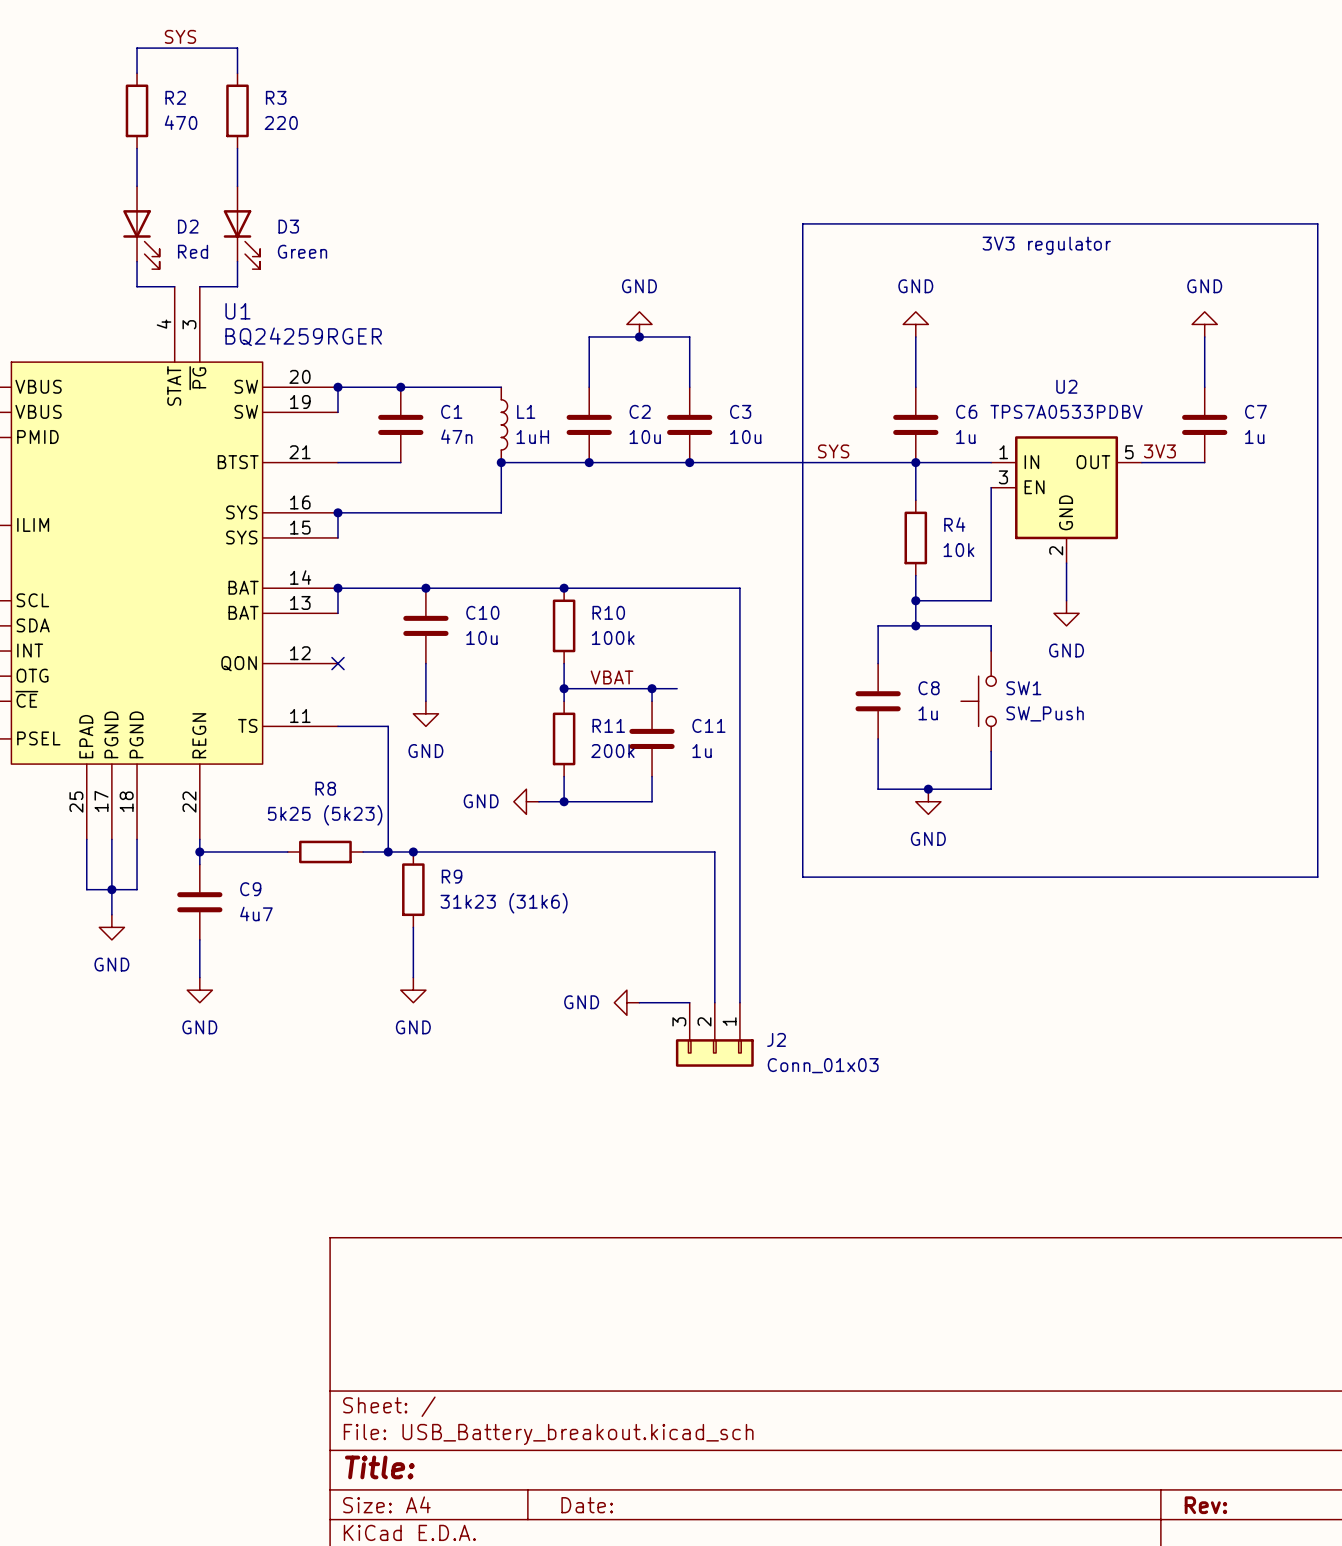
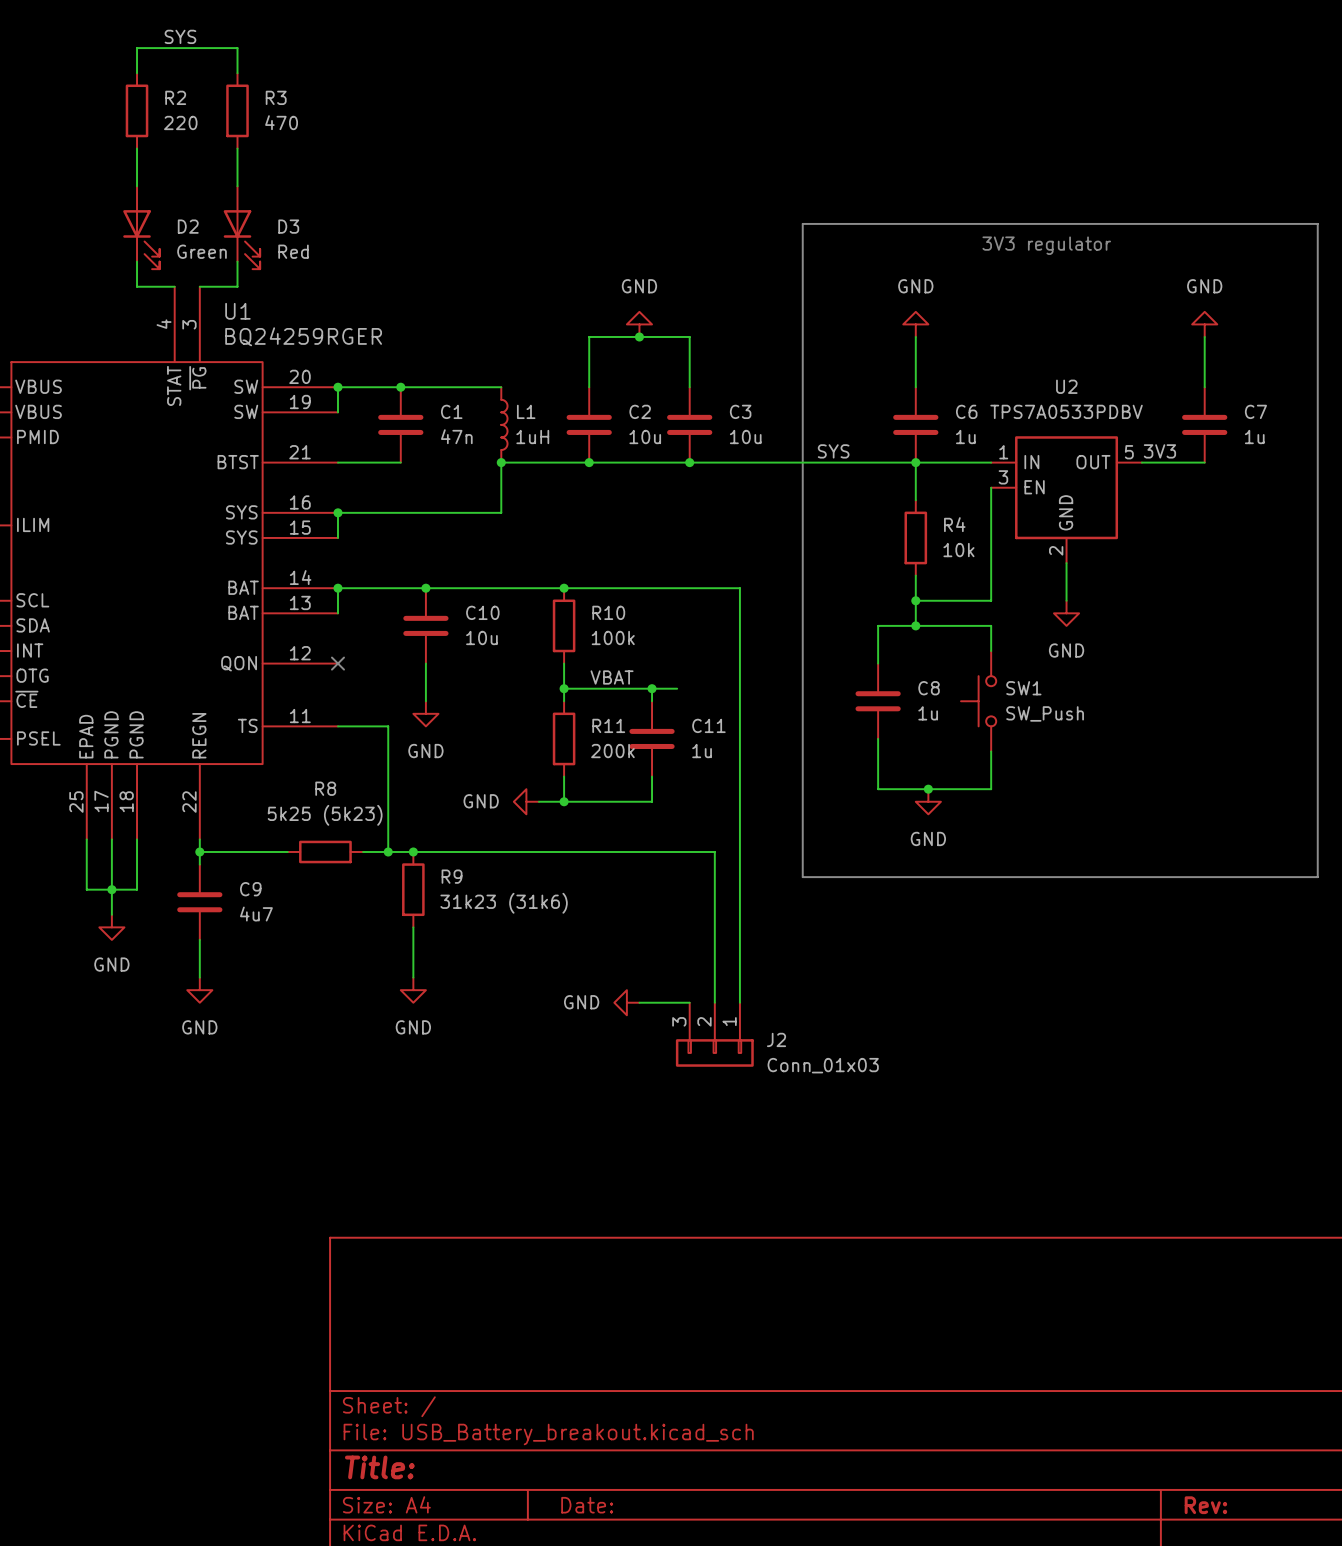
R2 value: 470 (181, 122) -> 220 (180, 122)
R3 value: 220 (281, 122) -> 470 (281, 122)
D2 value: Red (193, 251) -> Green (202, 251)
D3 value: Green (302, 251) -> Red (293, 251)

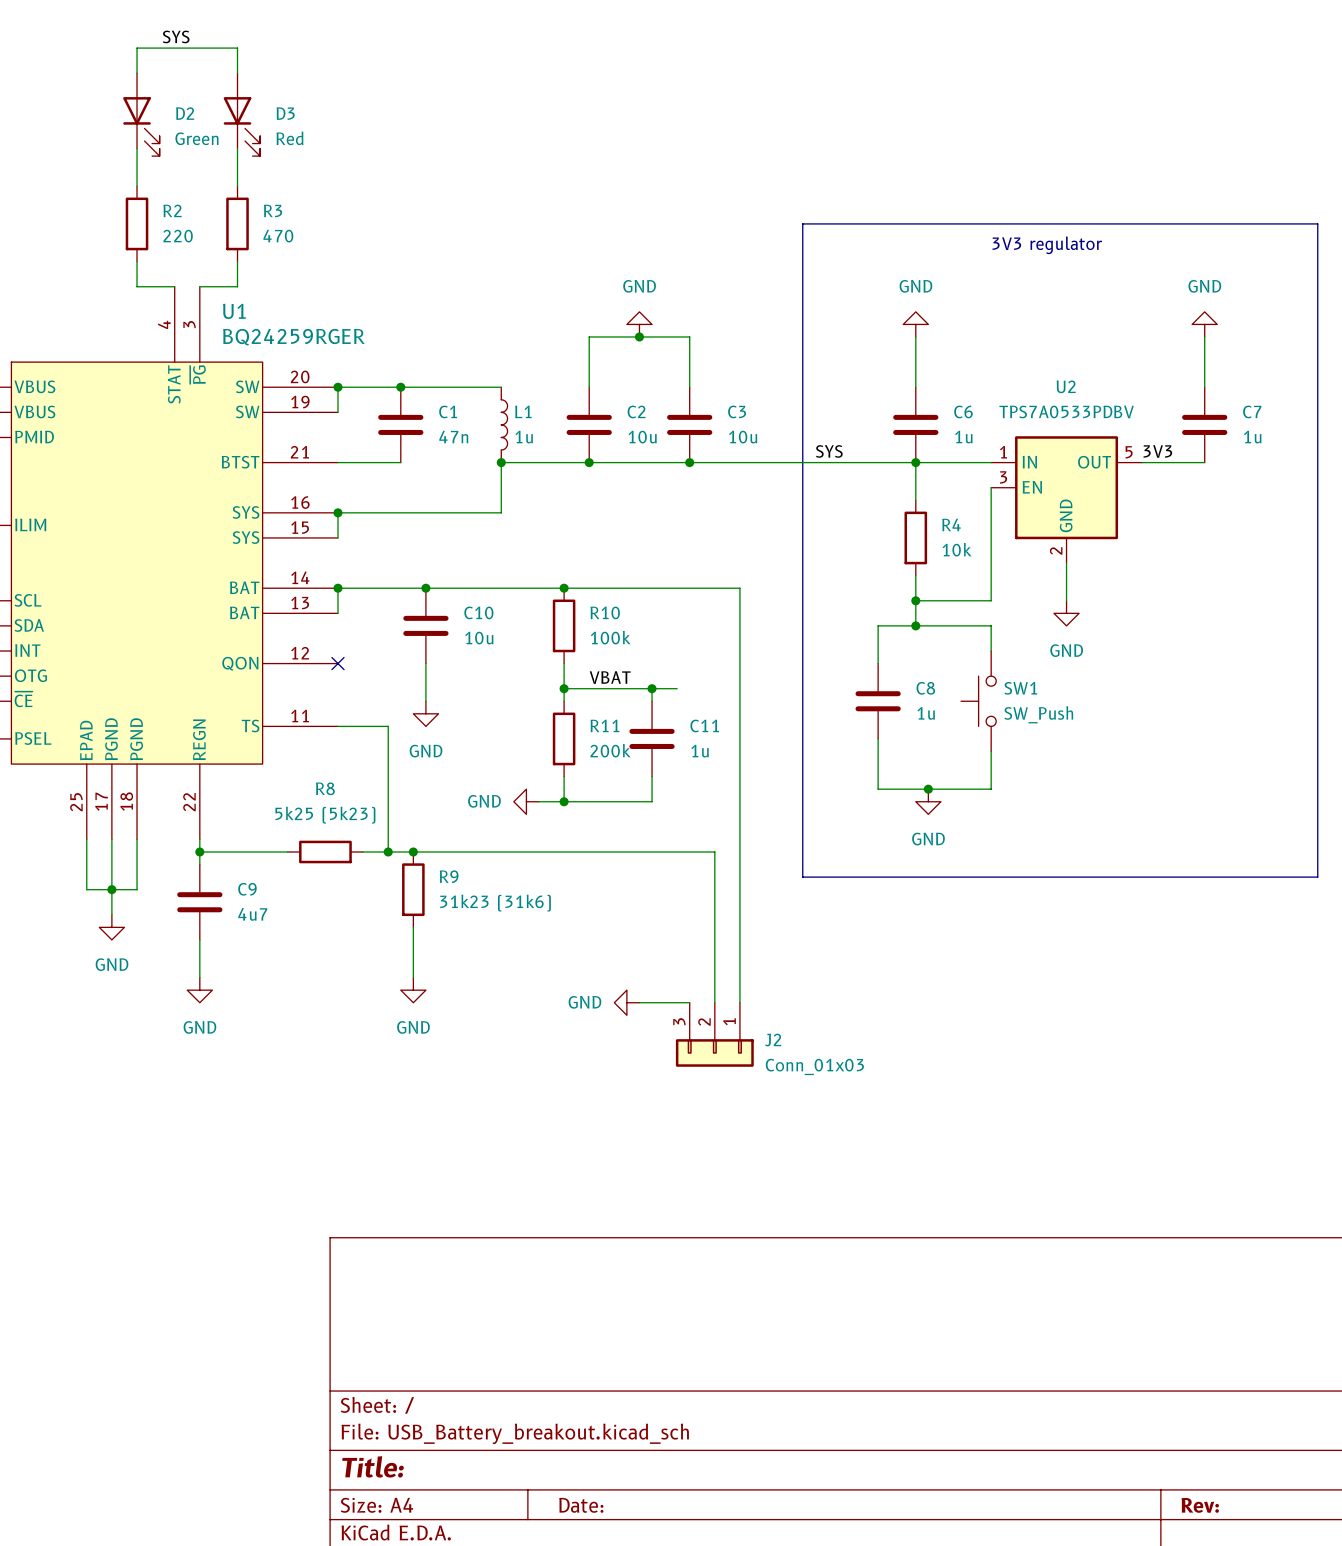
R2 position: (137, 110) -> (137, 223)
R3 position: (237, 110) -> (237, 223)
D2 position: (141, 227) -> (141, 114)
D3 position: (241, 227) -> (241, 114)
L1 value: 1uH (532, 437) -> 1u (524, 437)

